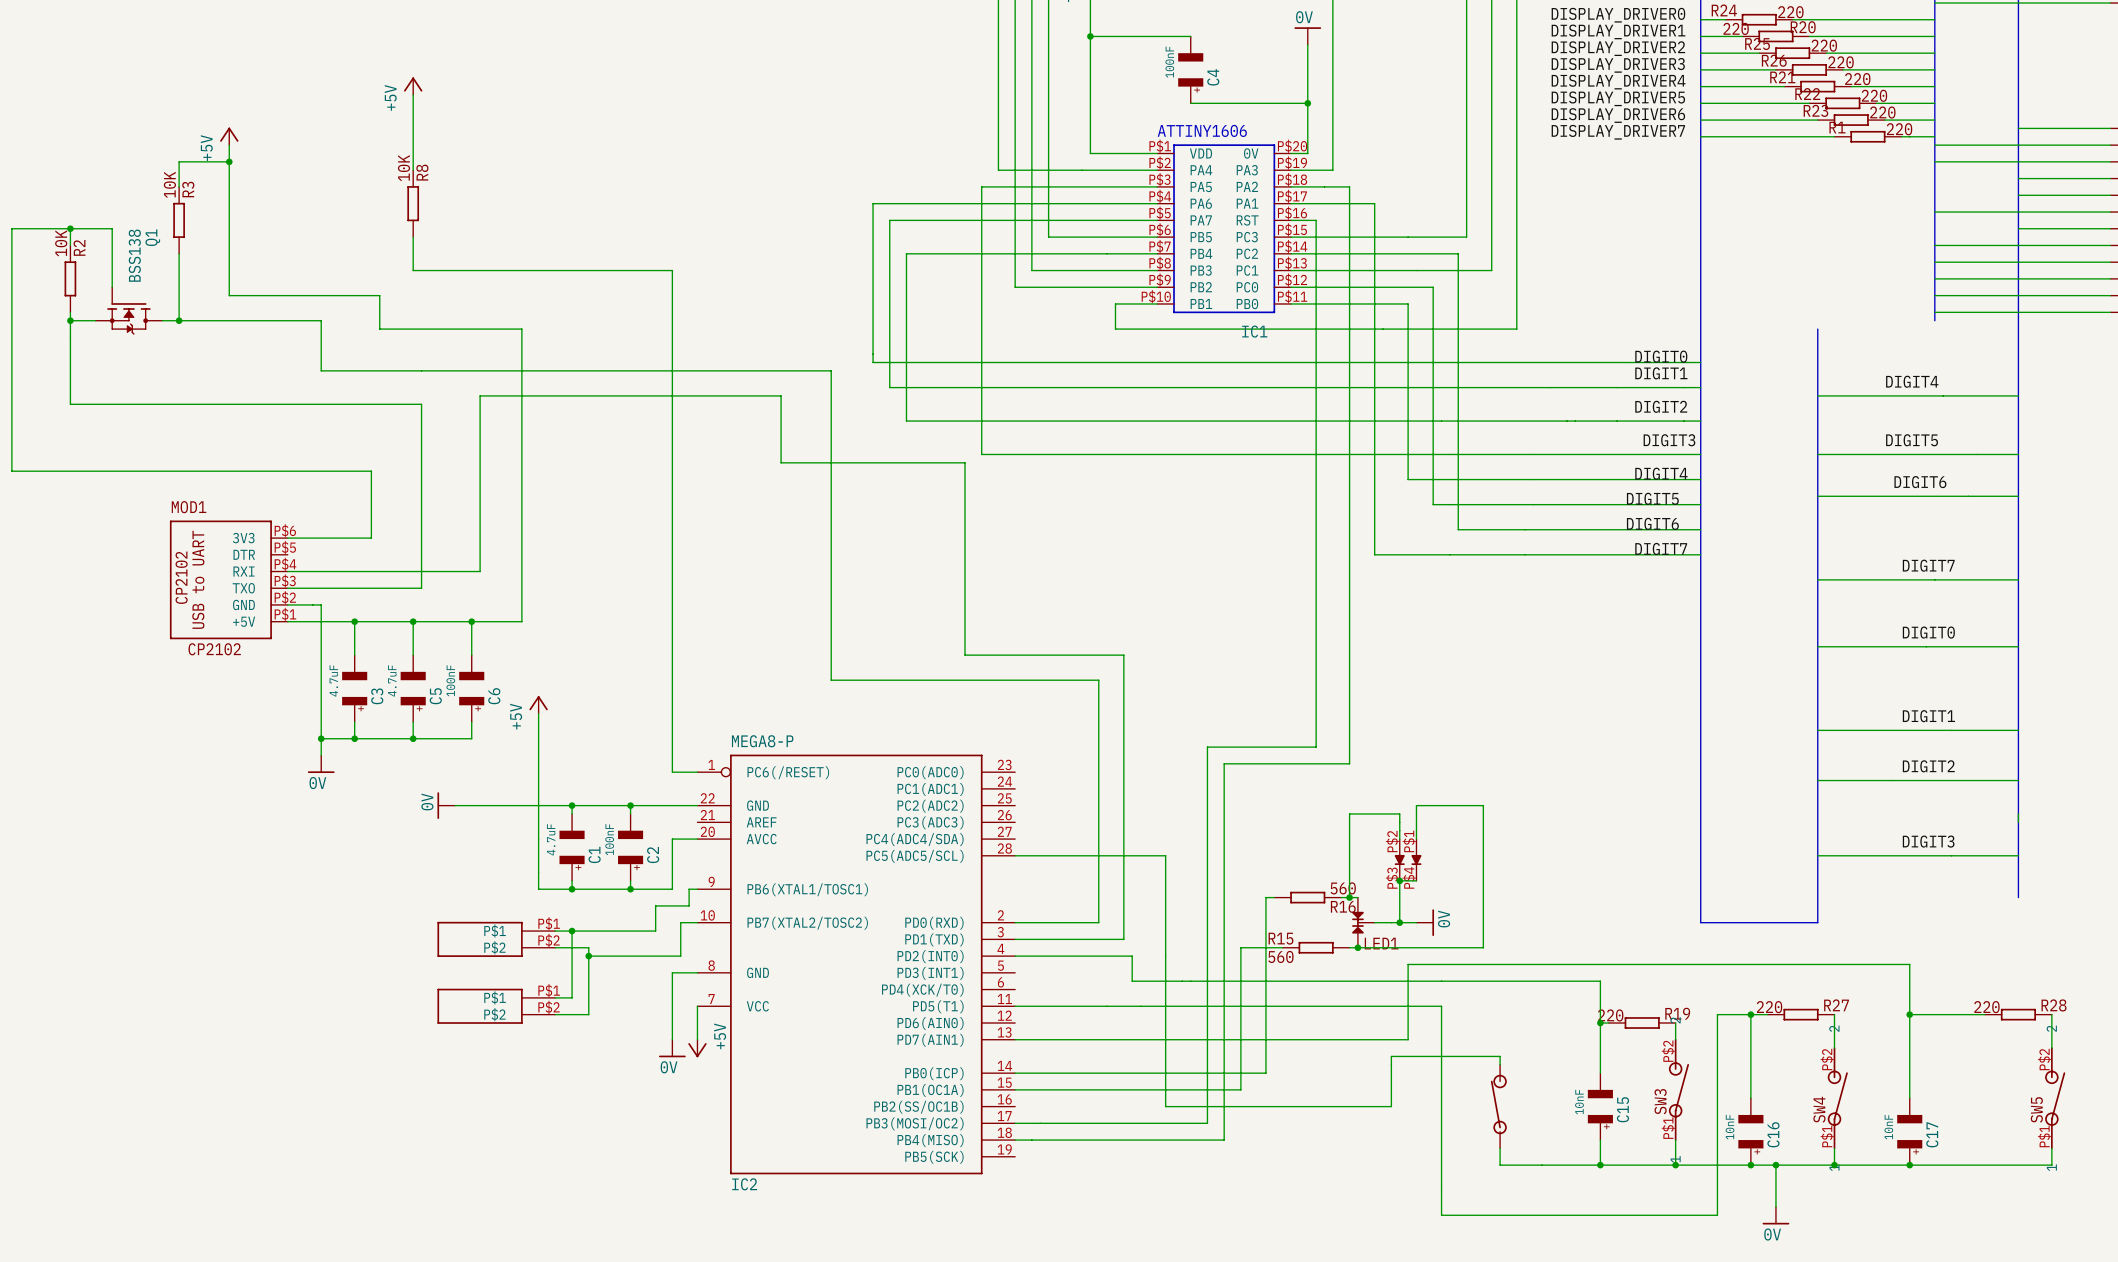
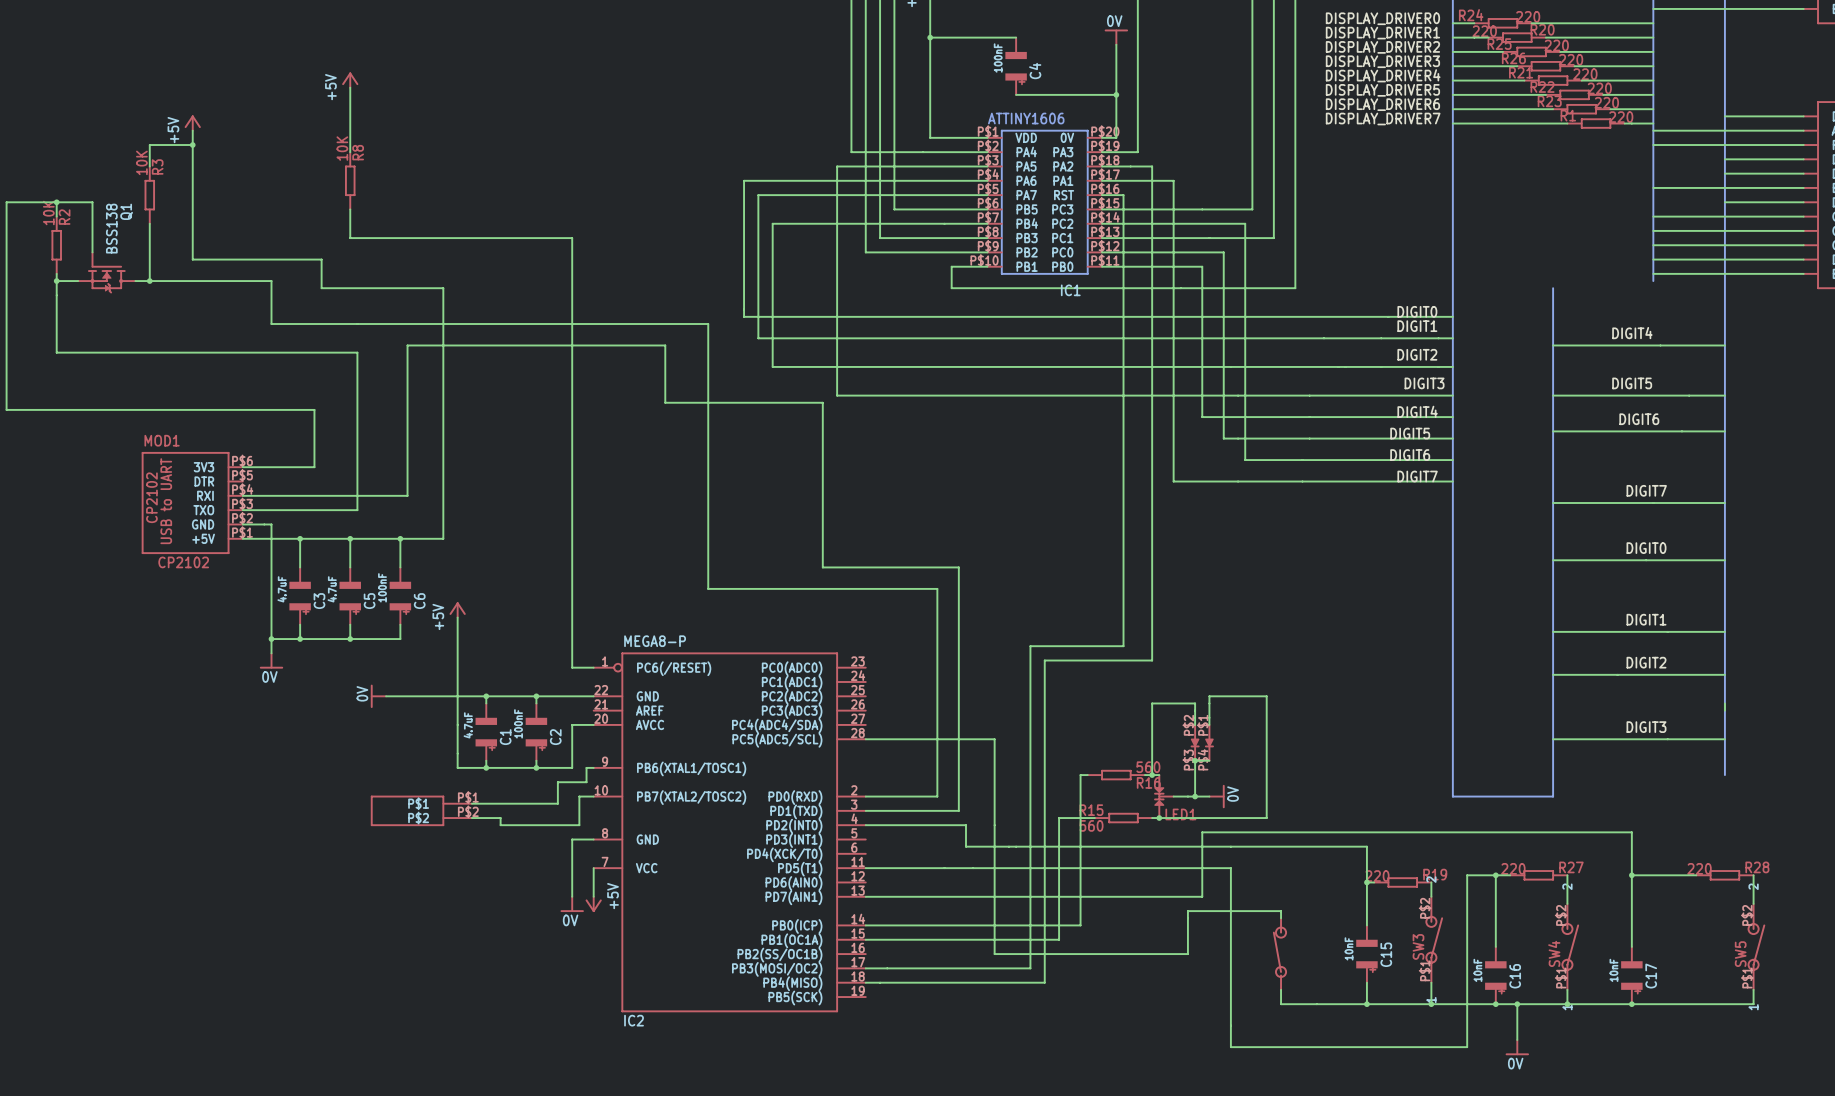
wire: (572, 931) (572, 997) (555, 997) -> none
junction: (572, 931) -> none
wire: (588, 956) (588, 1014) (555, 1014) -> none
junction: (588, 956) -> none
part: (496, 1006) -> none

